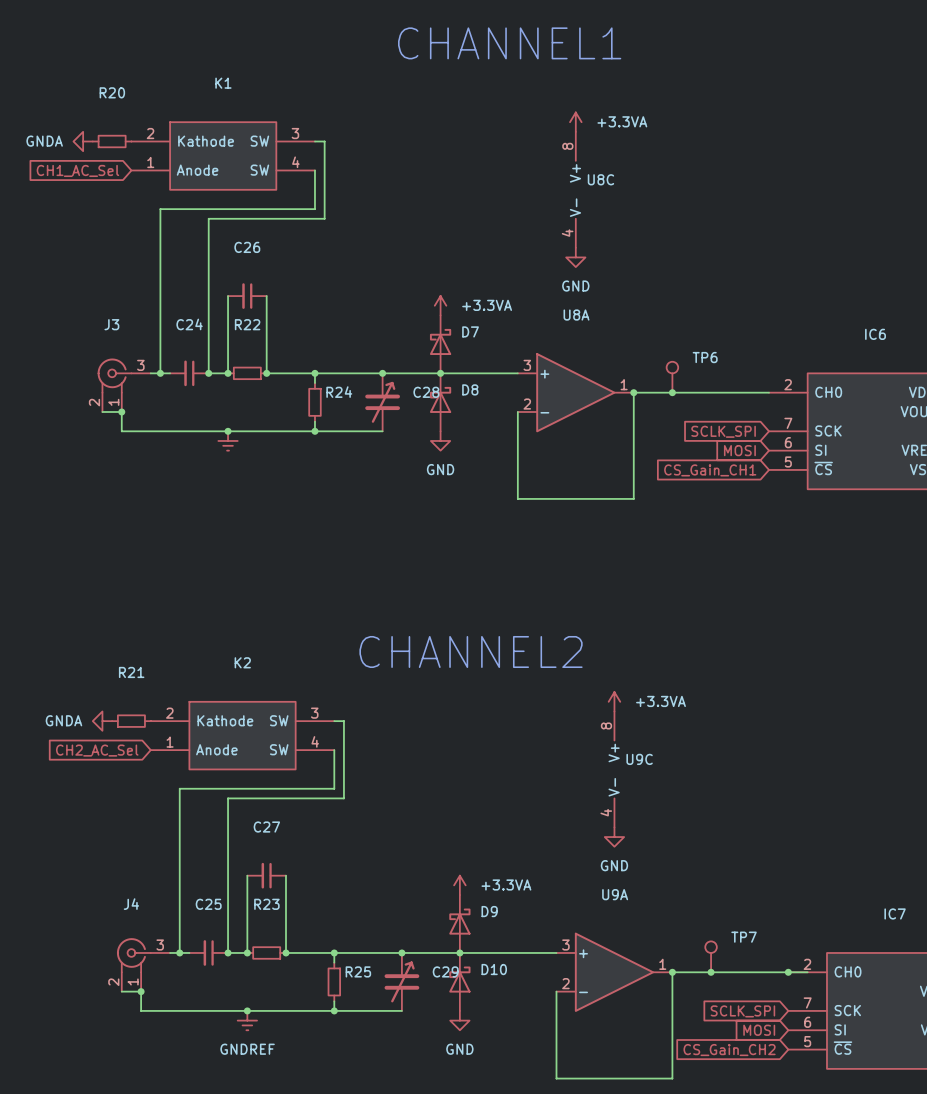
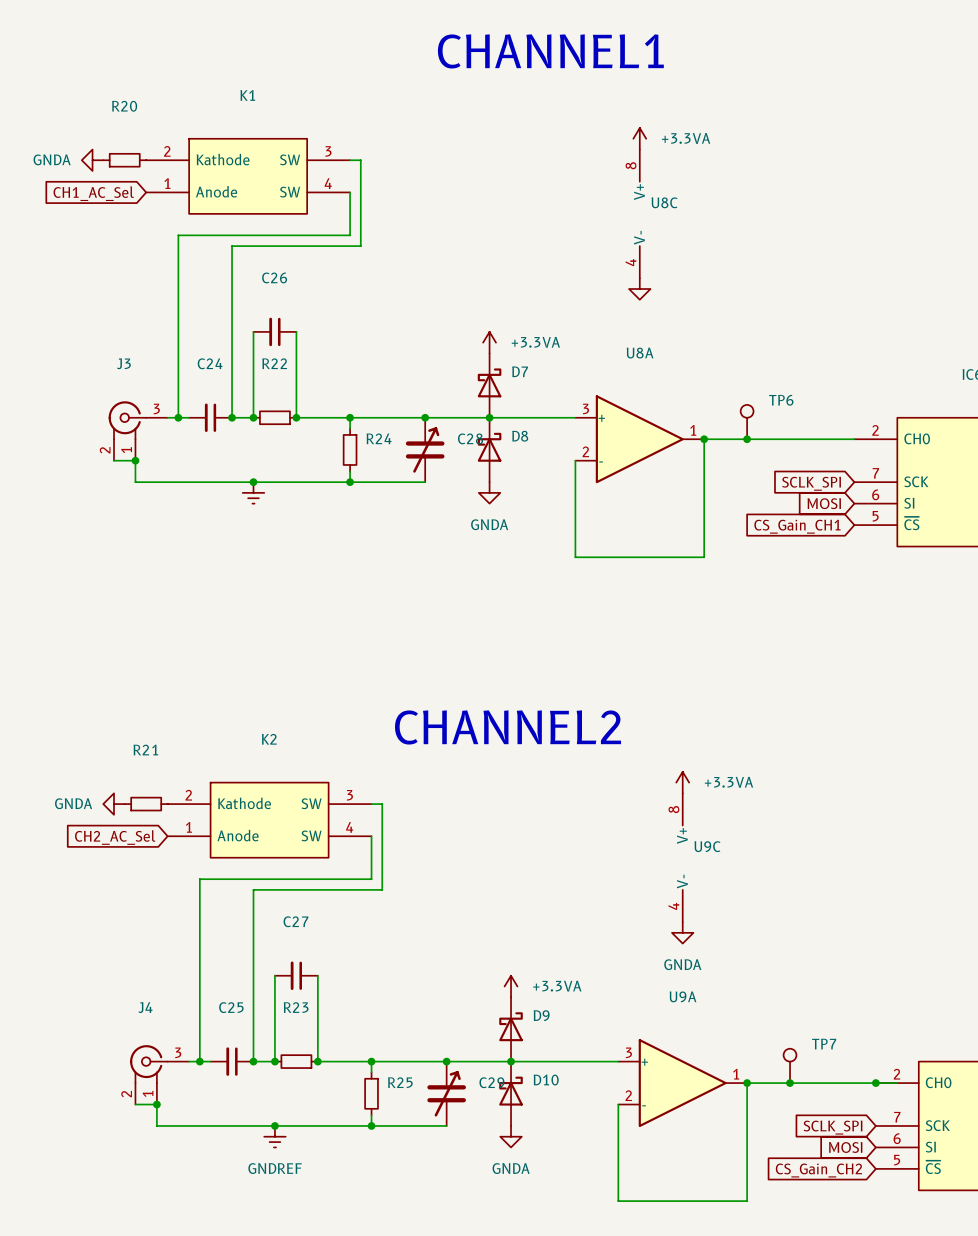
power symbol text: GND (575, 286) -> none
power symbol: GND (440, 440) -> GNDA (489, 492)
power symbol: GND (614, 837) -> GNDA (682, 932)
power symbol: GND (459, 1020) -> GNDA (511, 1136)

